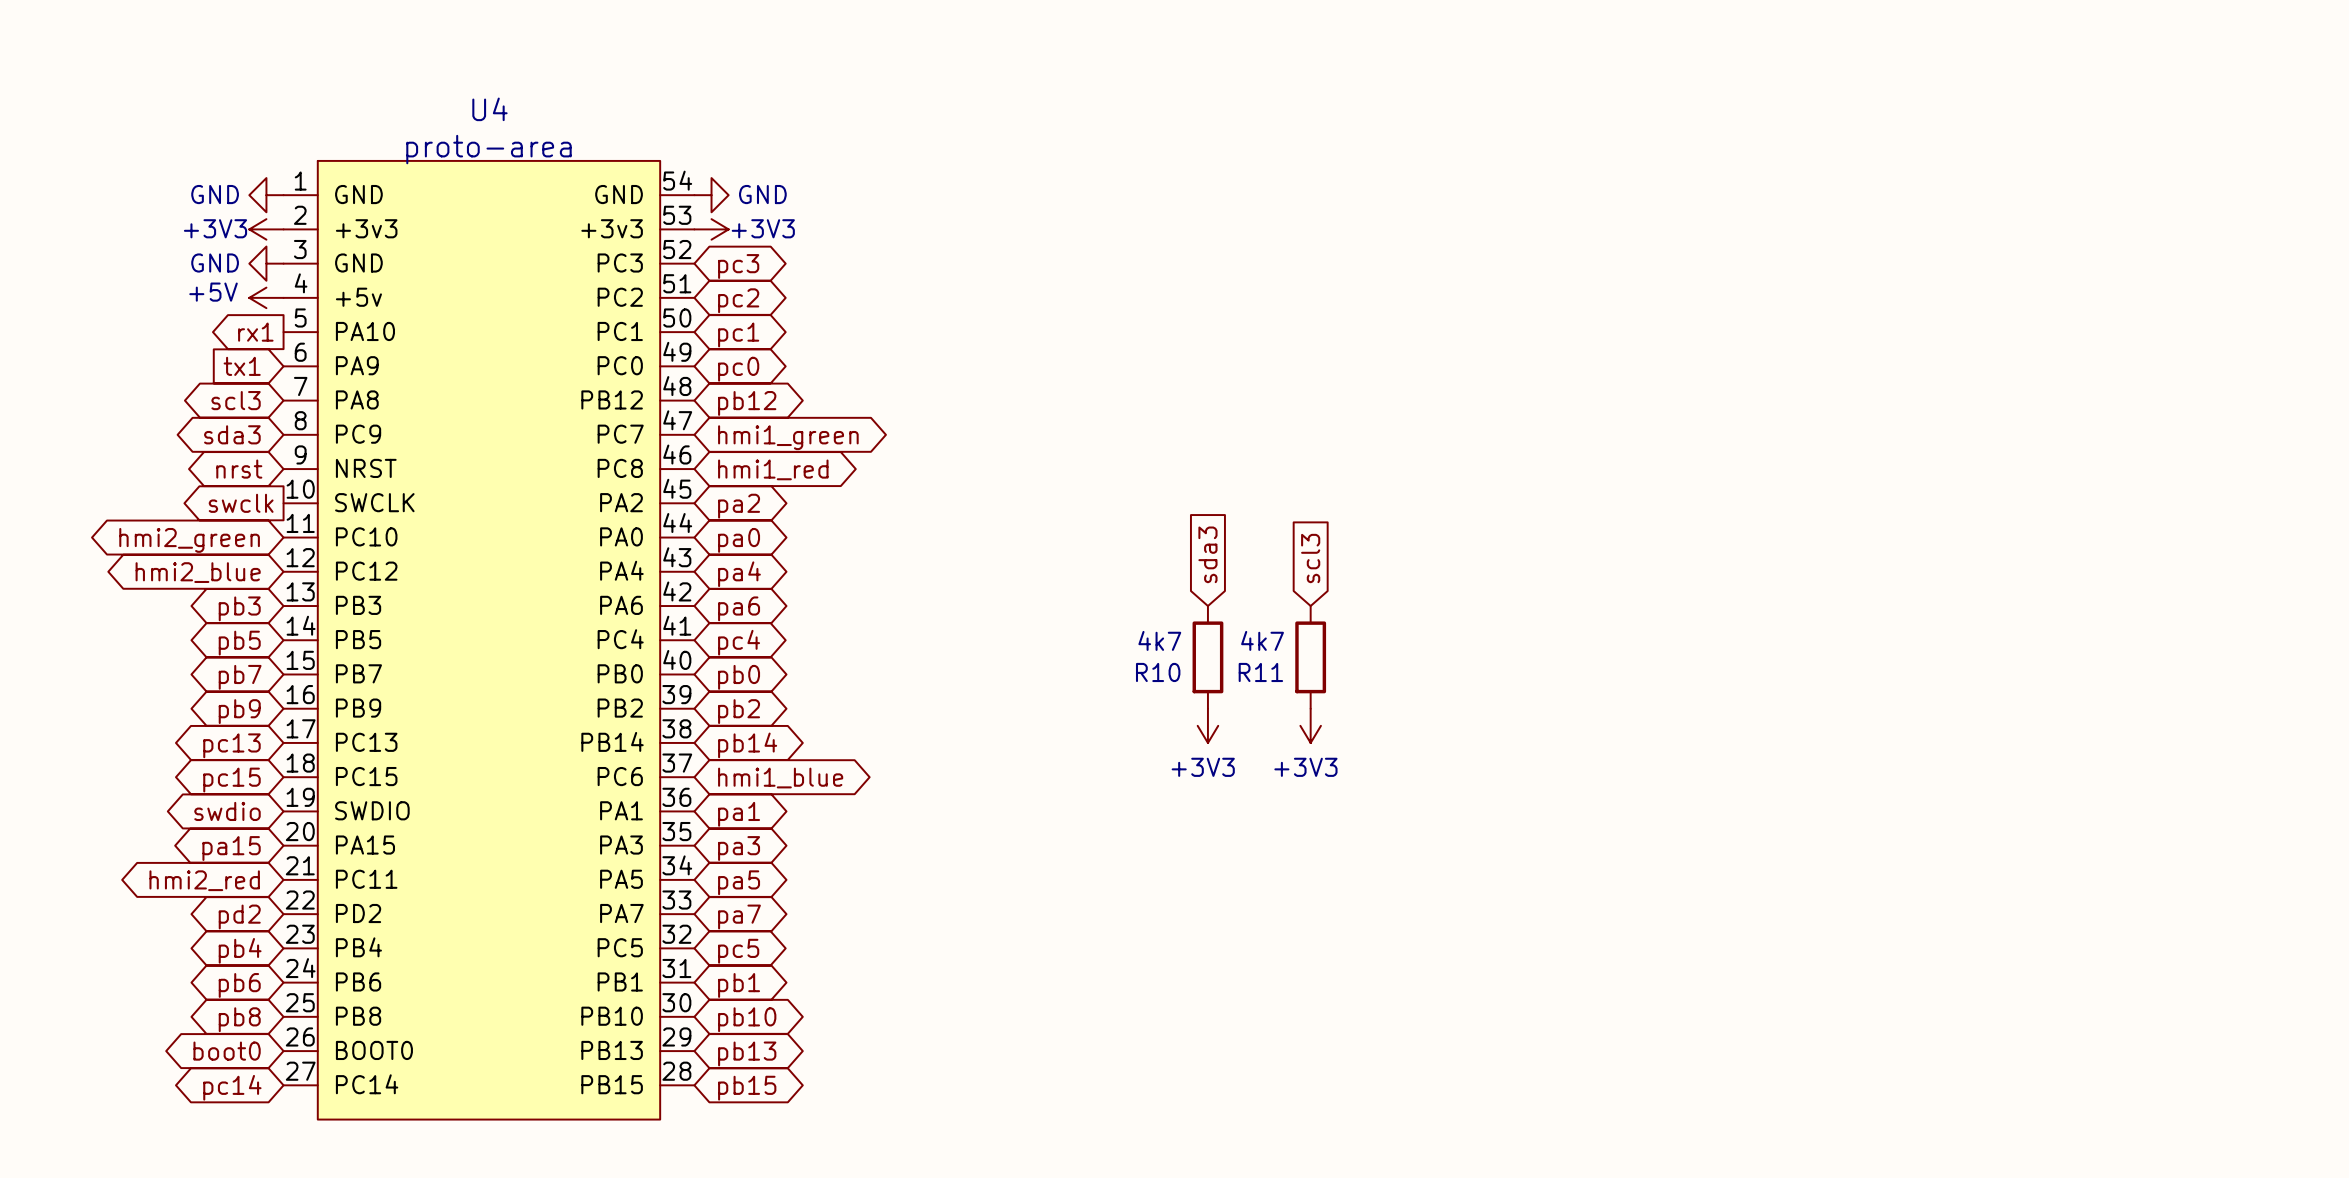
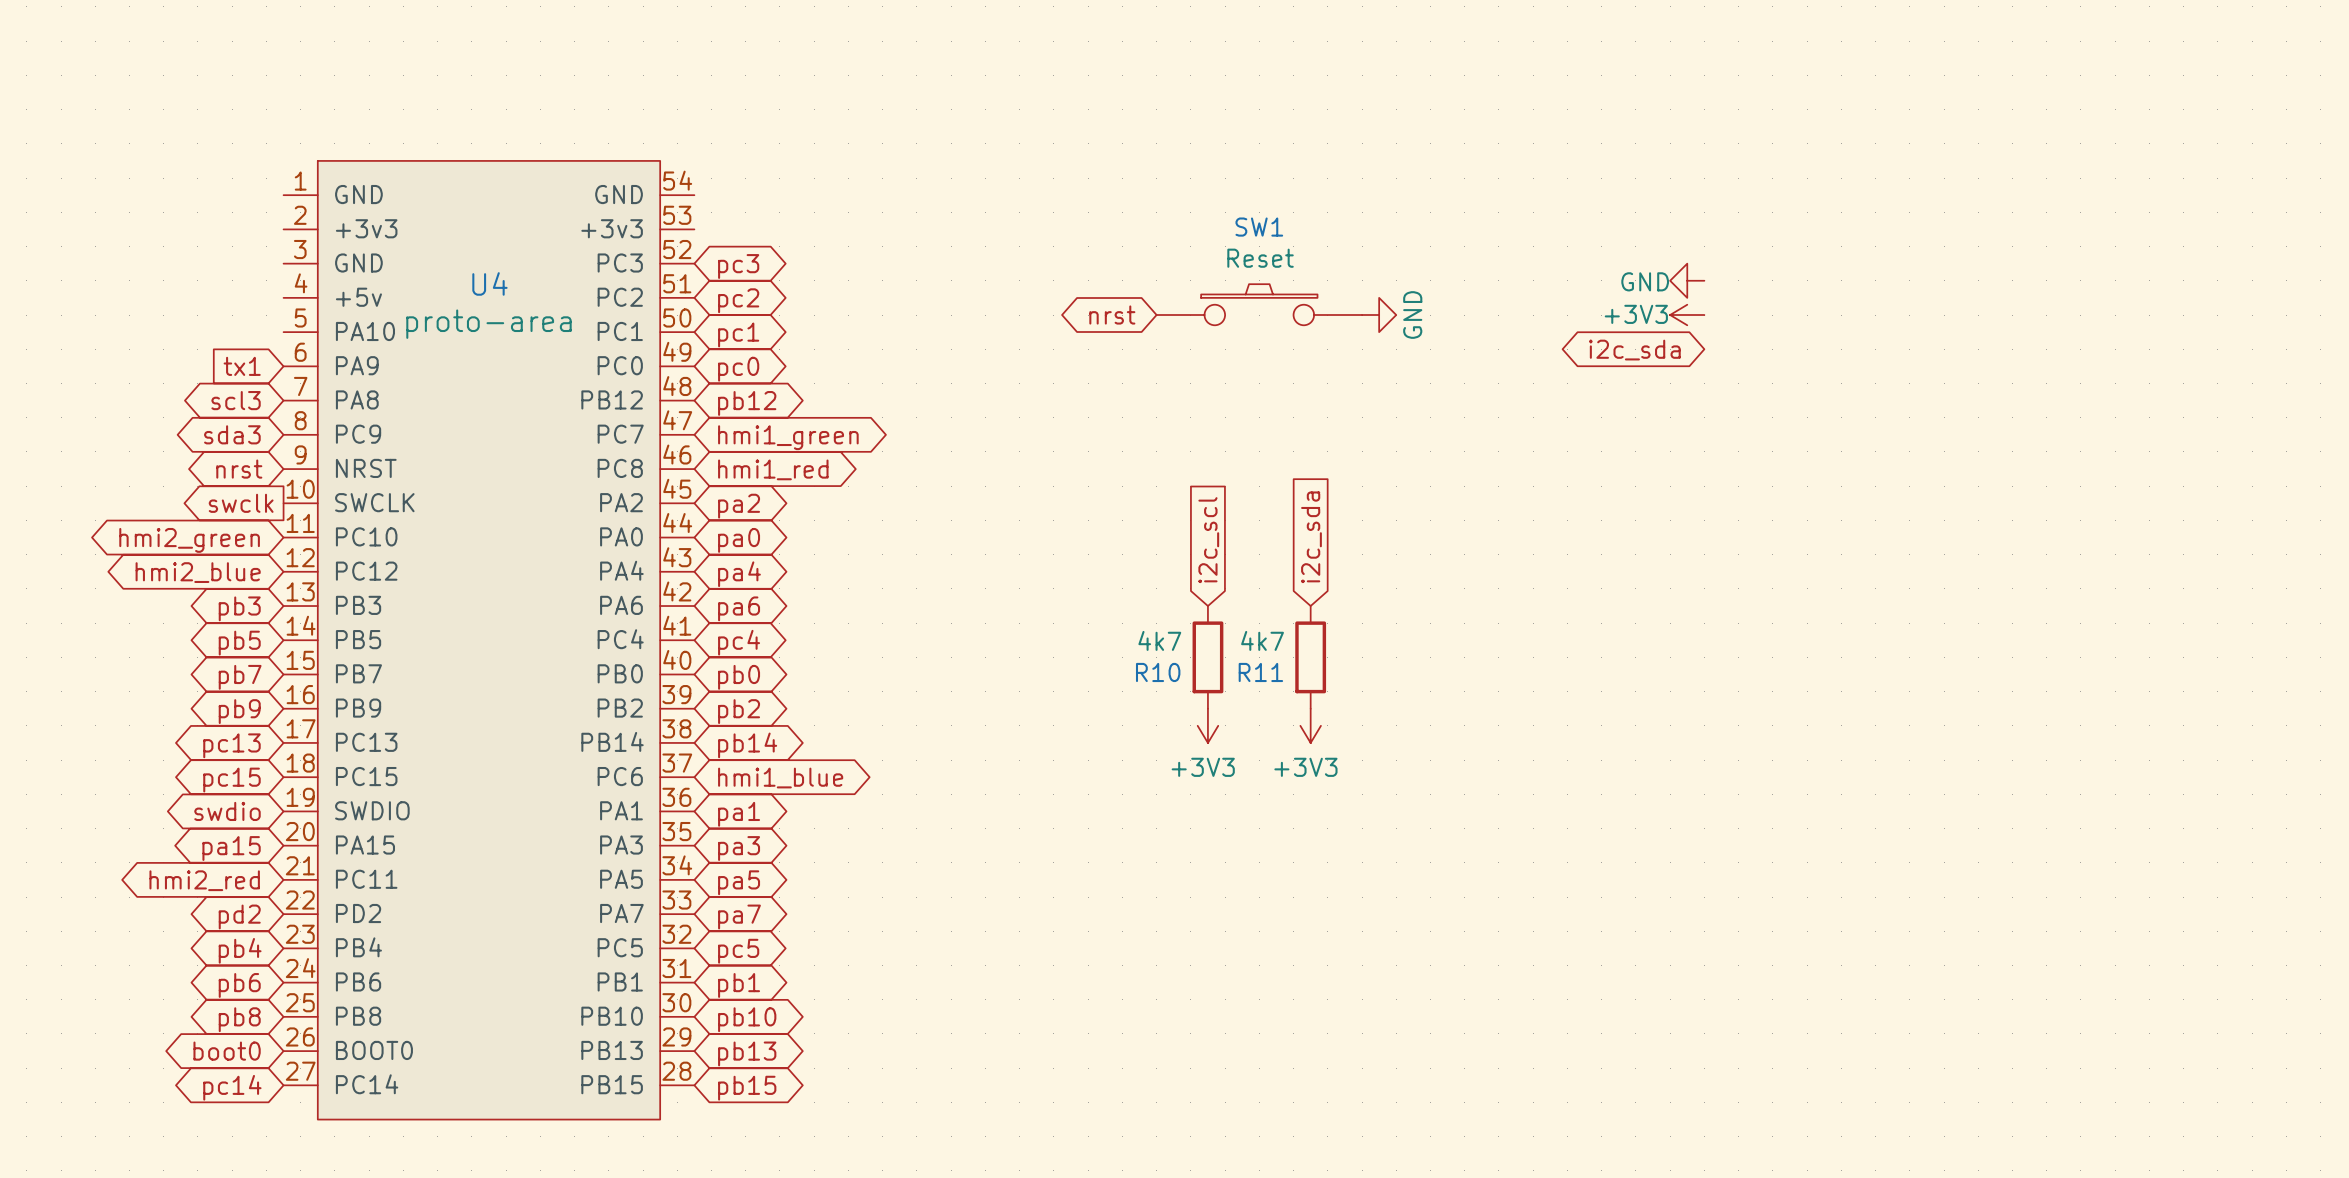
U4 name position: U4 (489, 109) -> U4 (489, 283)
U4 value position: proto-area (488, 149) -> proto-area (488, 324)
power symbol: GND (266, 195) -> none
power symbol: GND (711, 195) -> none
power symbol: +3V3 (266, 229) -> none
power symbol: +3V3 (711, 229) -> none
power symbol: GND (266, 263) -> none
power symbol: none -> GND (1687, 280)
power symbol: +5V (266, 297) -> none
SW1: none -> Reset (1259, 304)
global label: none -> nrst (1112, 315)
power symbol: none -> GND (1379, 315)
power symbol: none -> +3V3 (1687, 315)
global label: rx1 (255, 332) -> none
global label: none -> i2c_sda (1634, 350)
global label: sda3 (1207, 554) -> i2c_scl (1208, 540)
global label: scl3 (1310, 558) -> i2c_sda (1311, 537)

